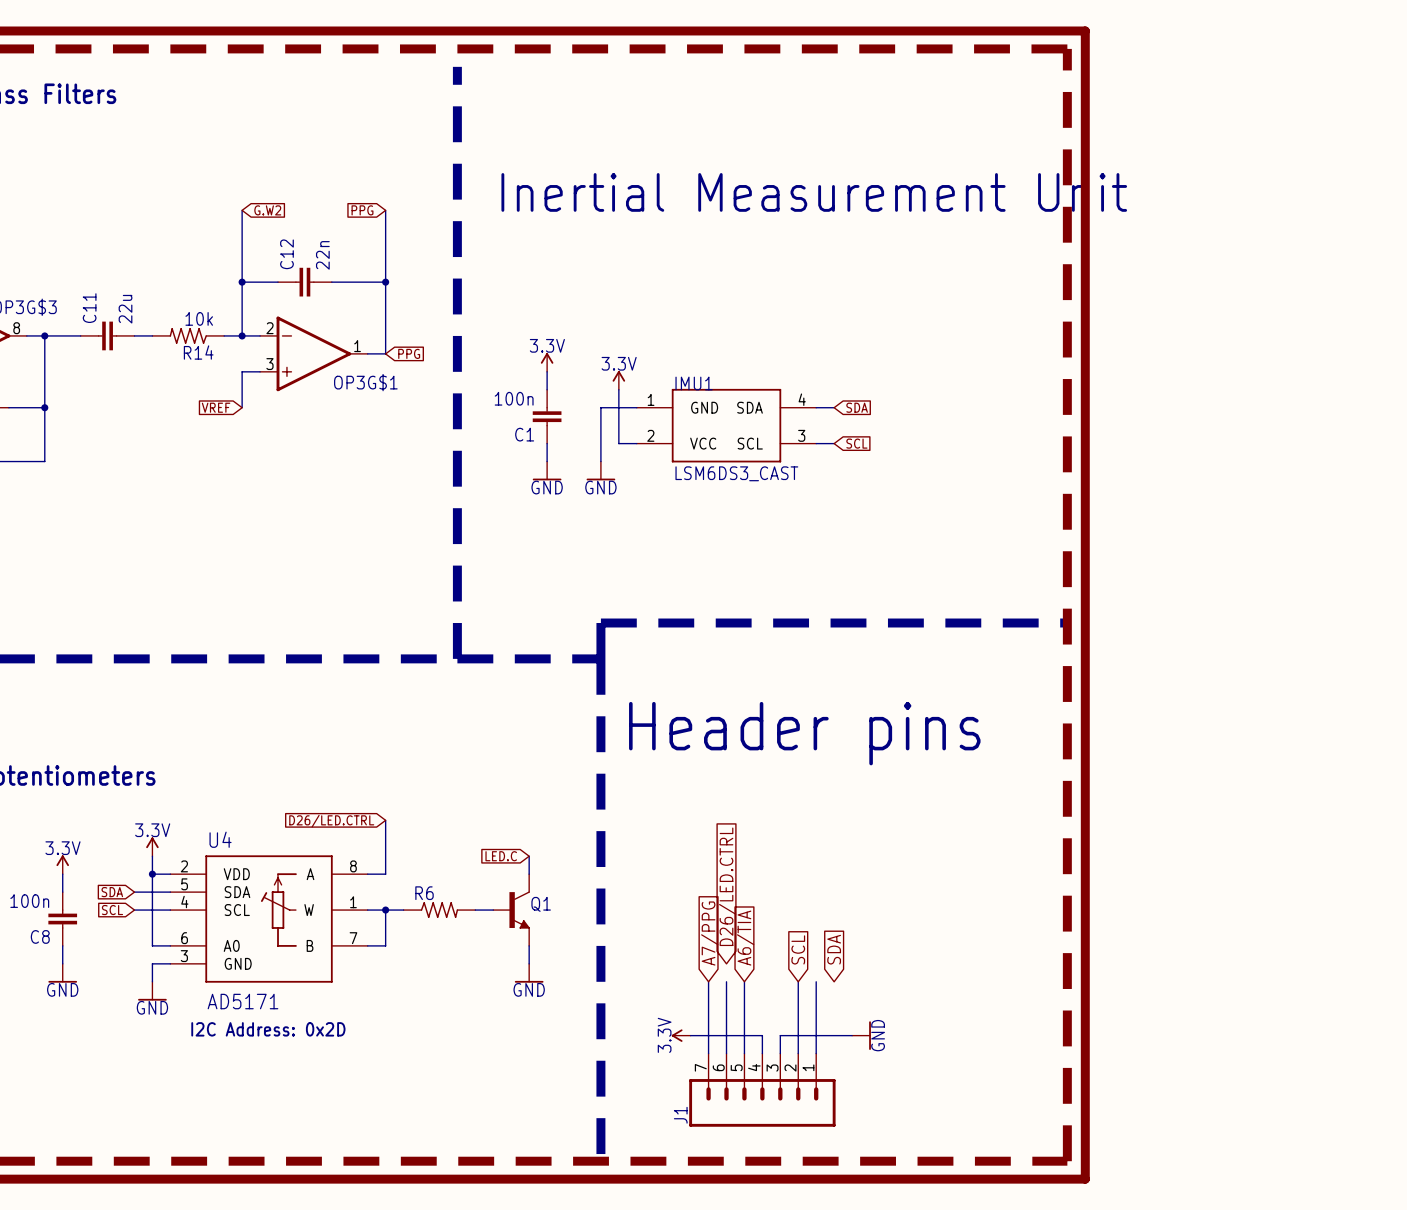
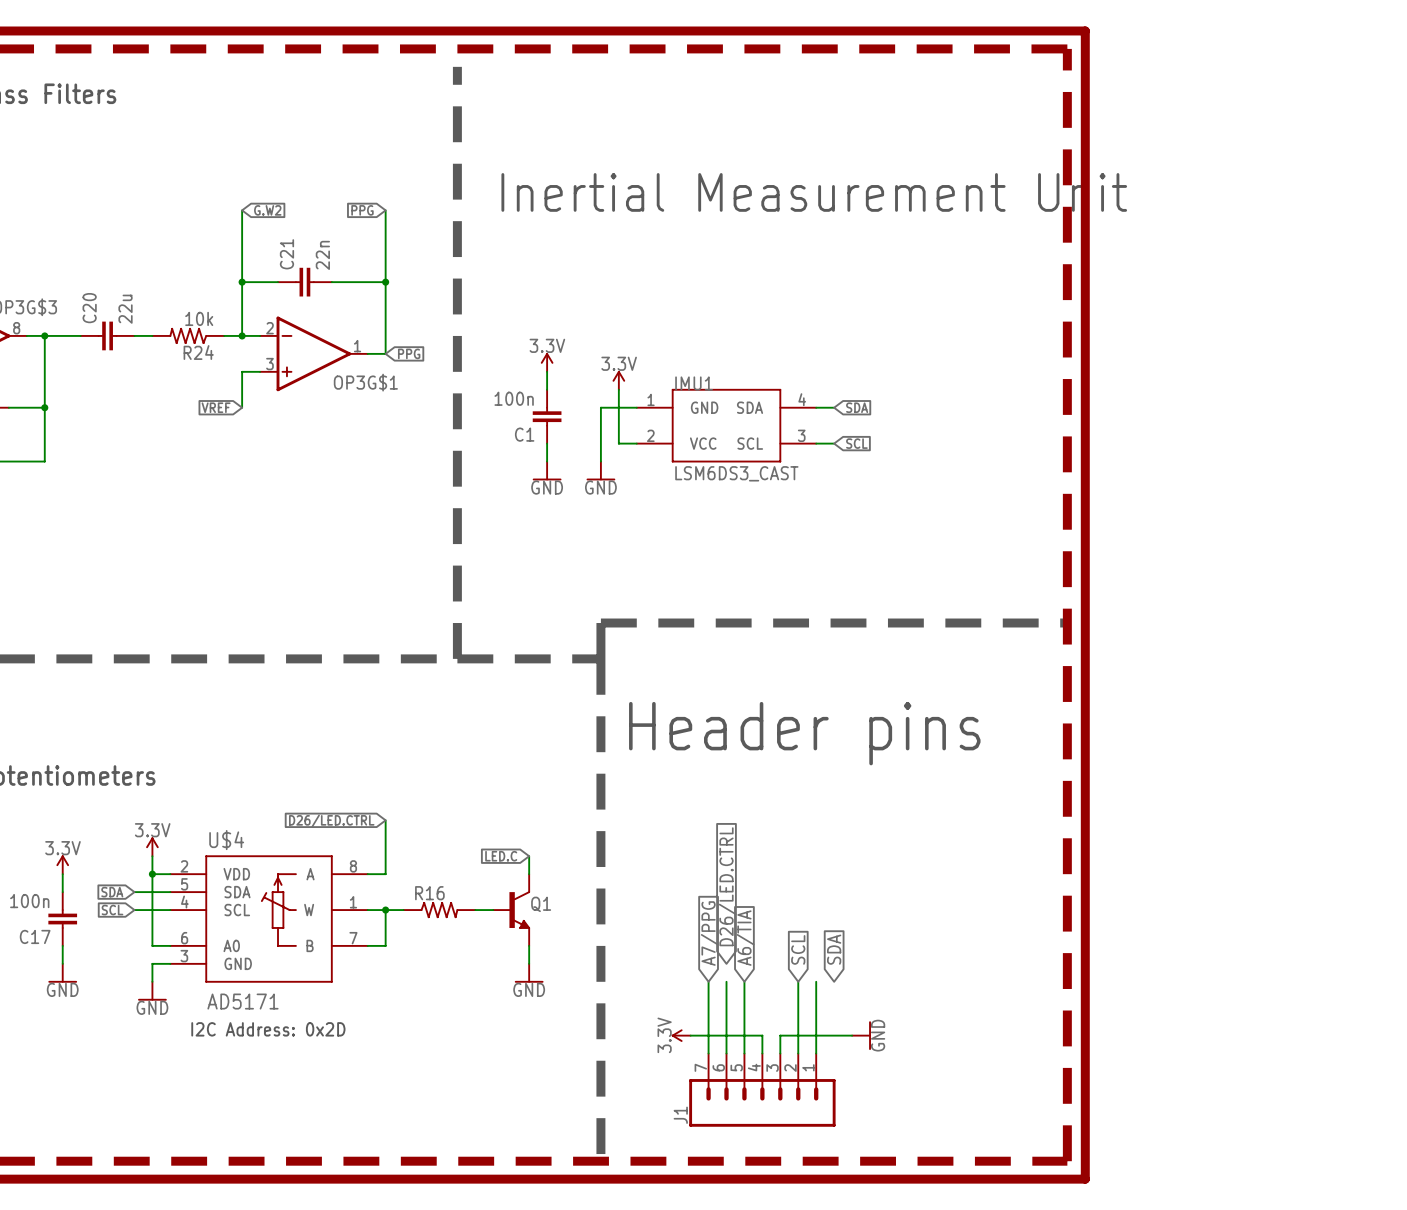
C12 name: C12 (286, 254) -> C21 (286, 254)
C11 name: C11 (89, 308) -> C20 (89, 308)
R14 name: R14 (198, 352) -> R24 (198, 352)
U4 name: U4 (220, 839) -> U$4 (226, 840)
R6 name: R6 (424, 893) -> R16 (429, 893)
C8 name: C8 (40, 936) -> C17 (35, 936)

